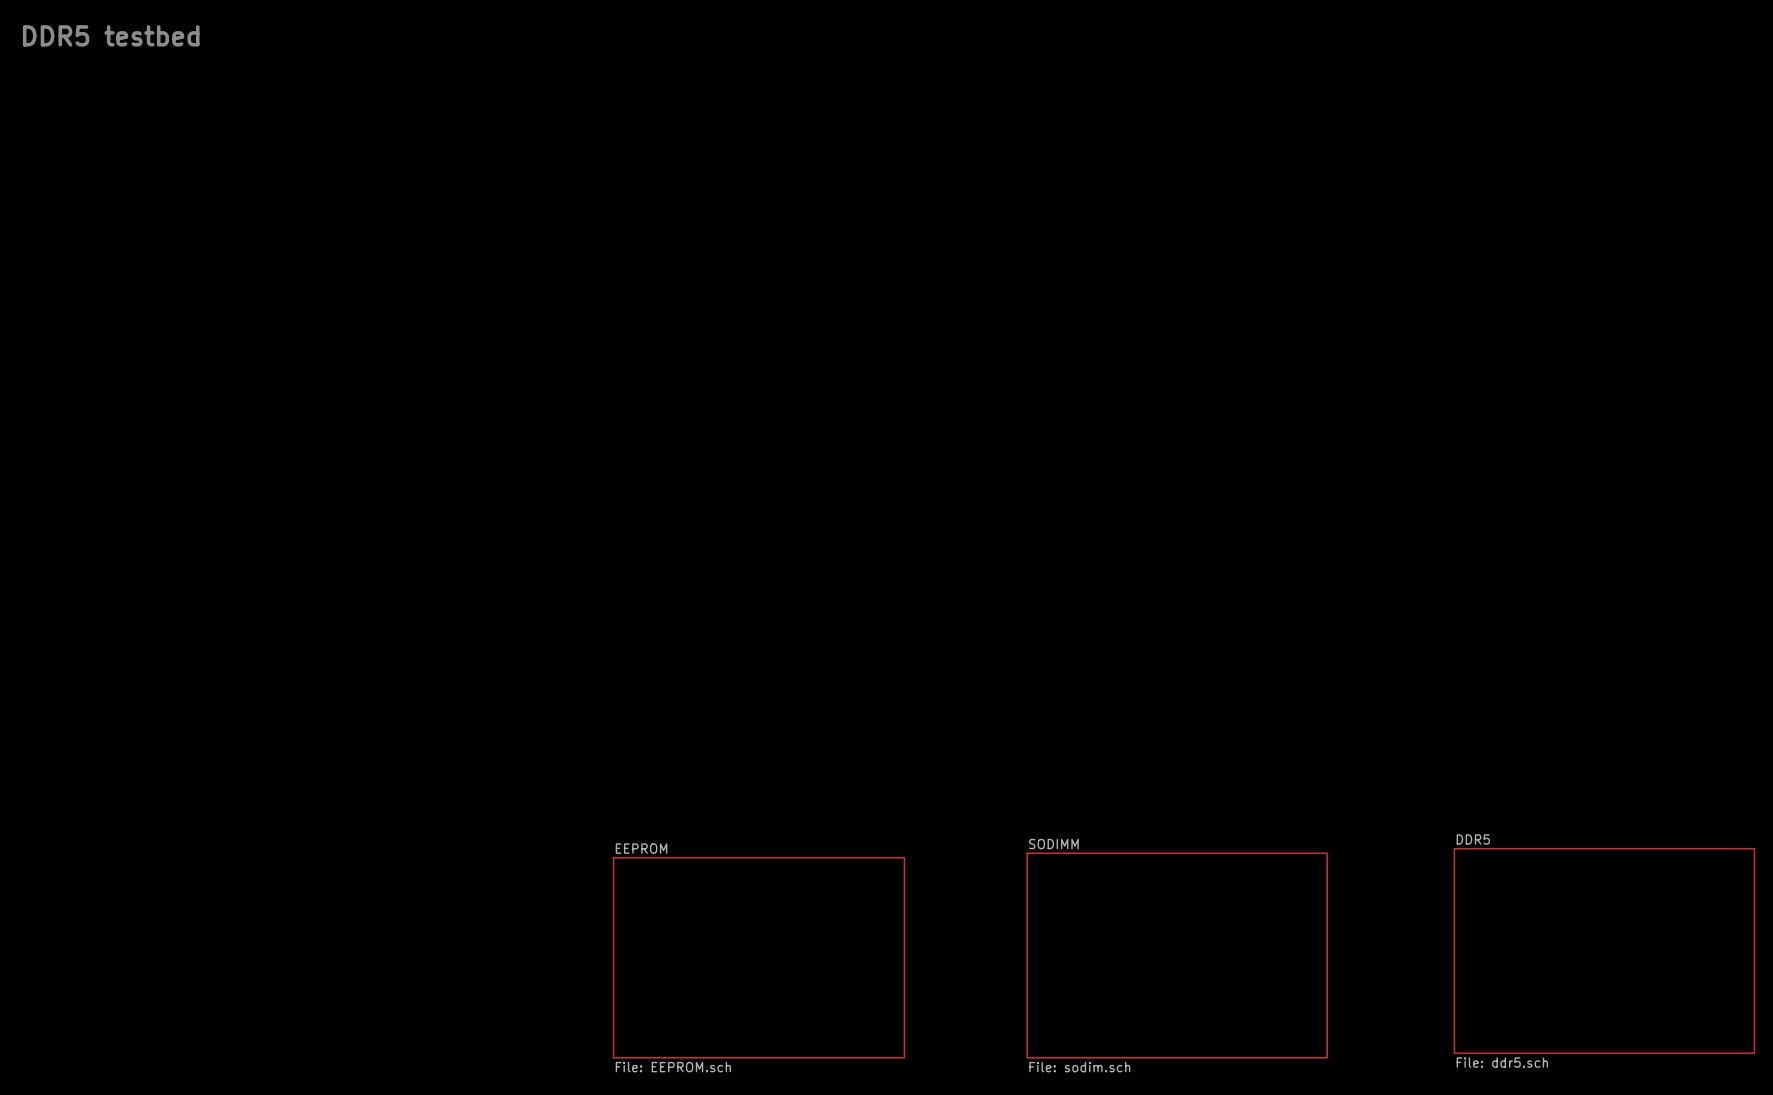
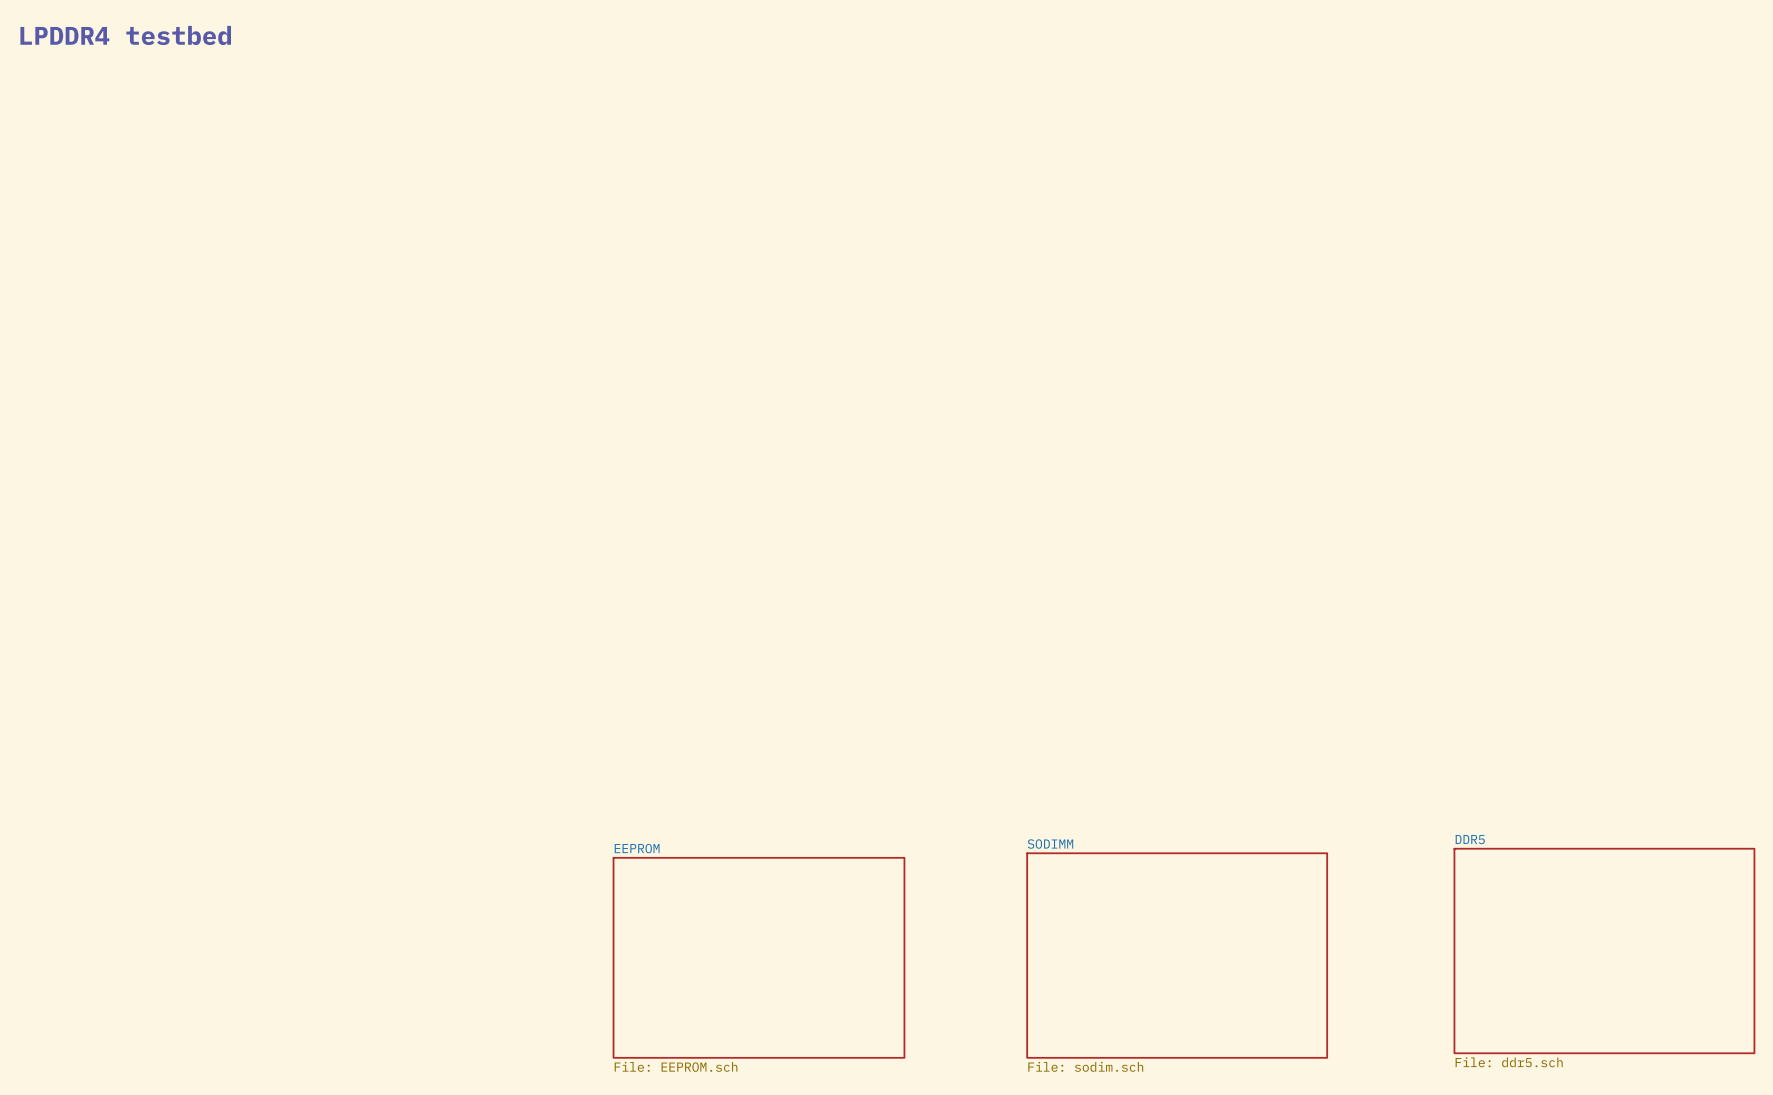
text: DDR5 testbed (111, 35) -> LPDDR4 testbed (125, 35)

